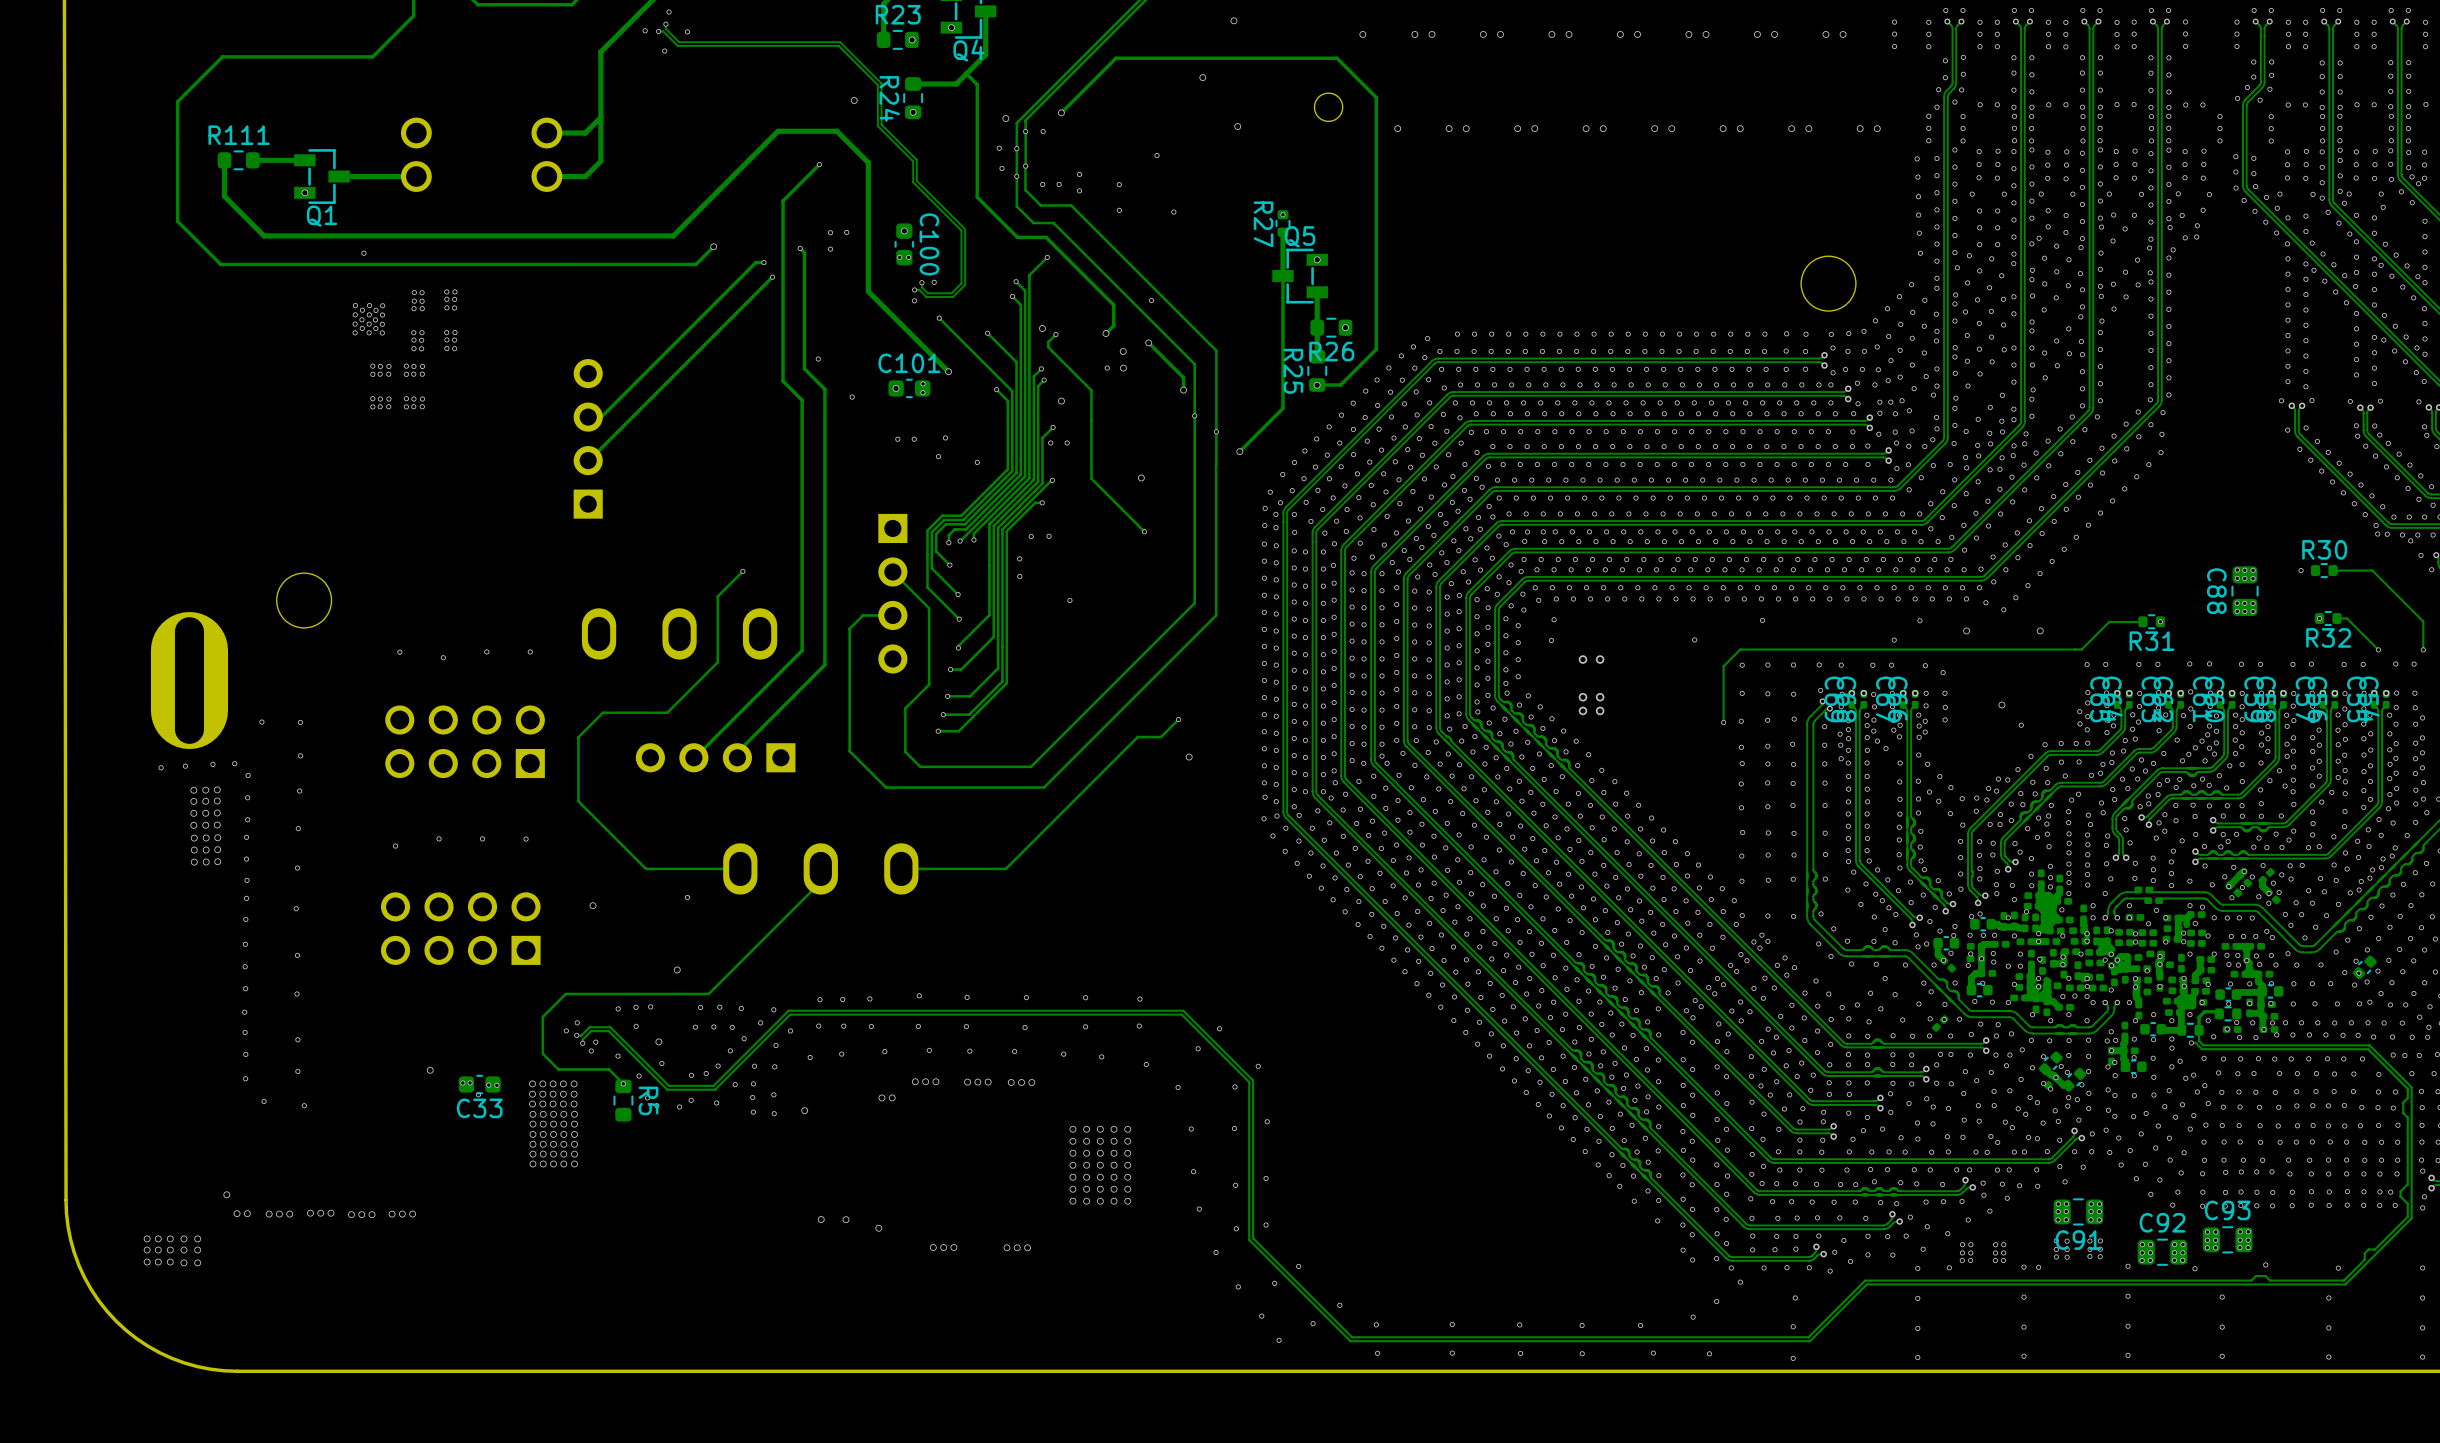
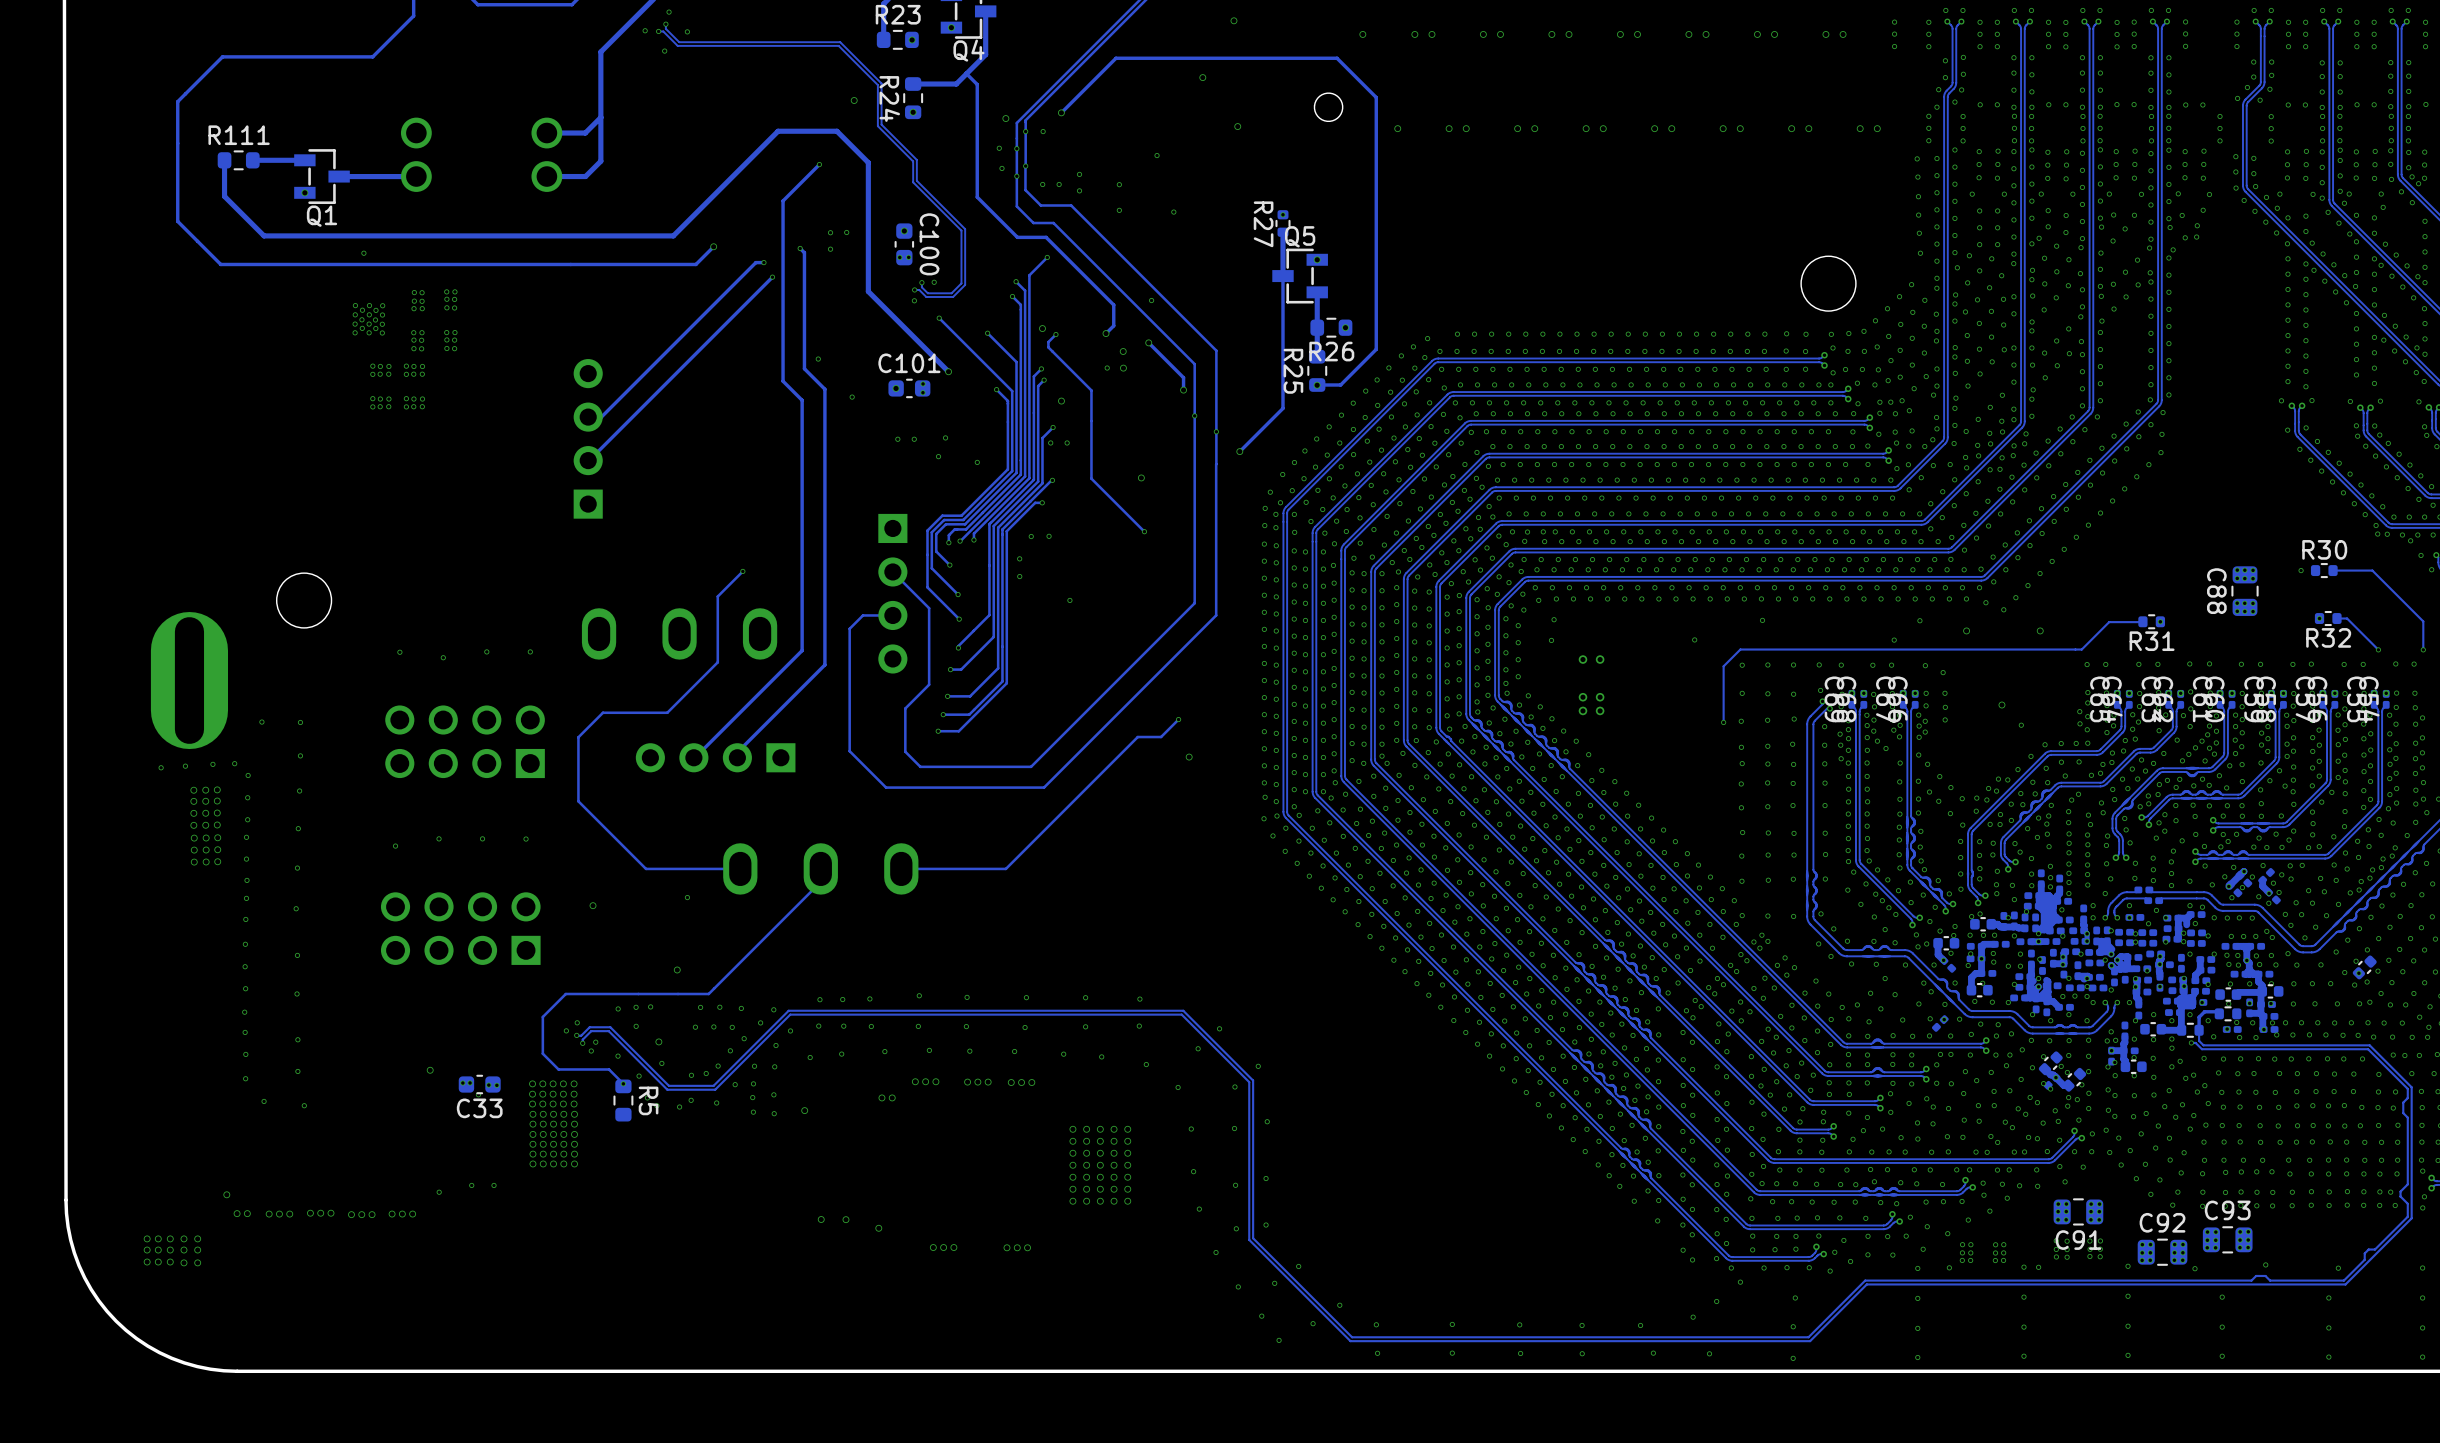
via: none -> (471, 1185)
via: none -> (494, 1185)
via: none -> (439, 1192)

